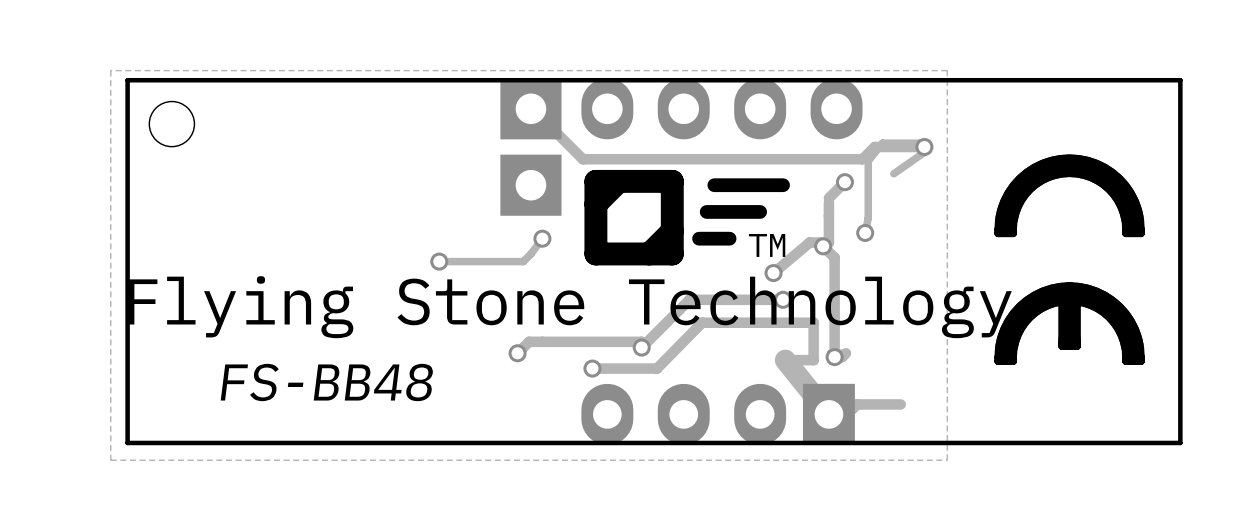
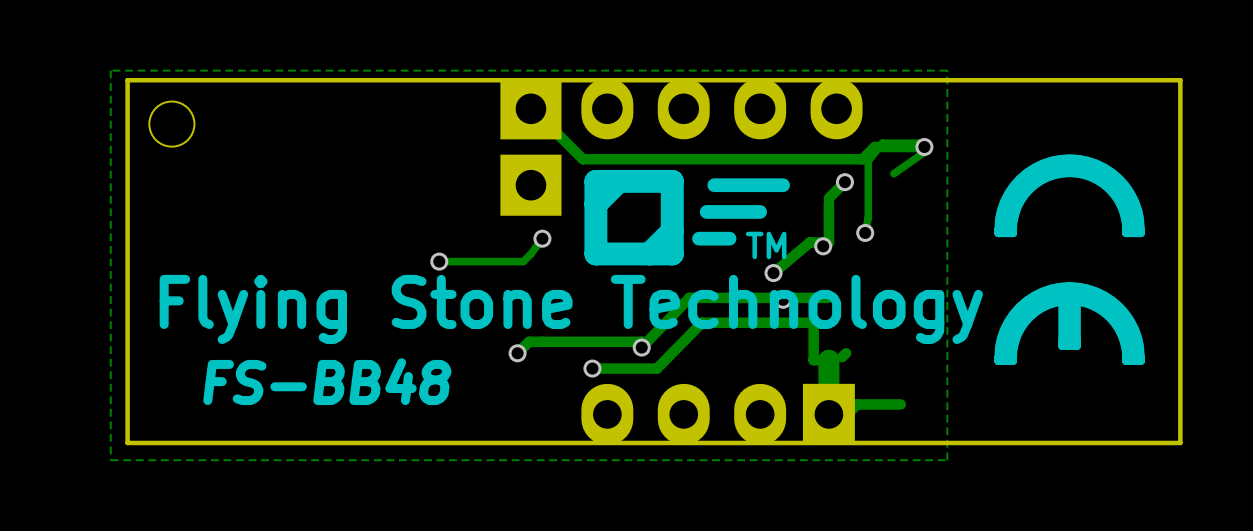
track: (828, 203) (828, 240) (823, 246) (834, 257) (834, 357) -> none
track: (783, 299) (689, 299) (641, 347) -> (828, 295) (827, 297) (689, 297) (641, 347)
via: (834, 357) -> none
track: (813, 360) (785, 360) (828, 414) -> (813, 360) (828, 360) (828, 414)

